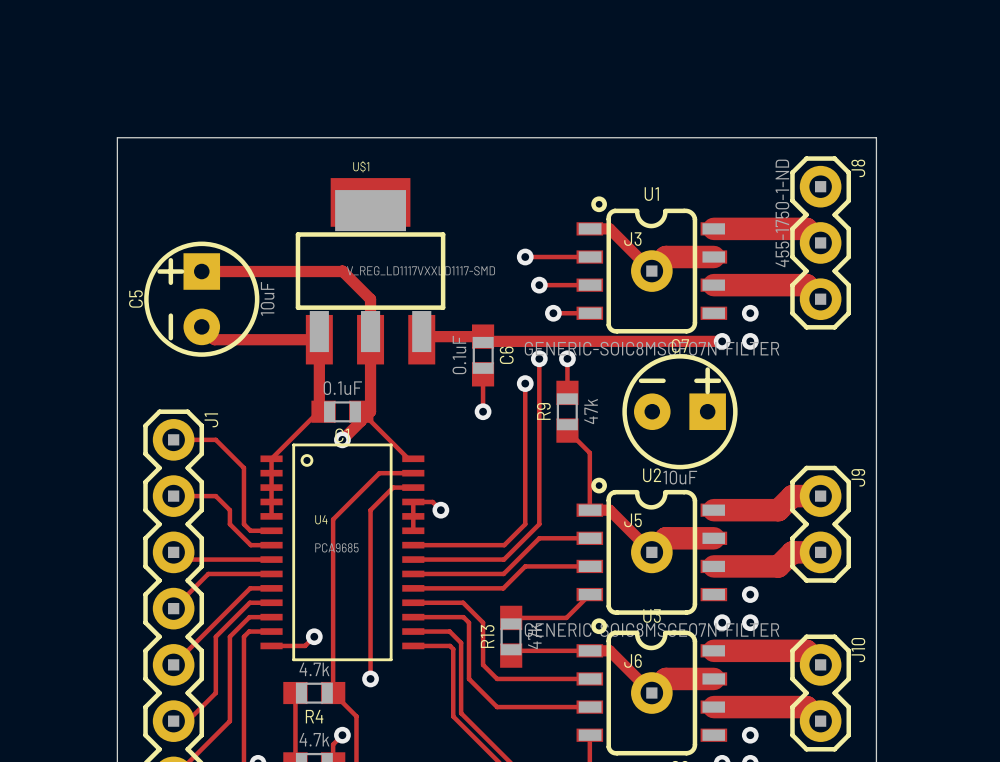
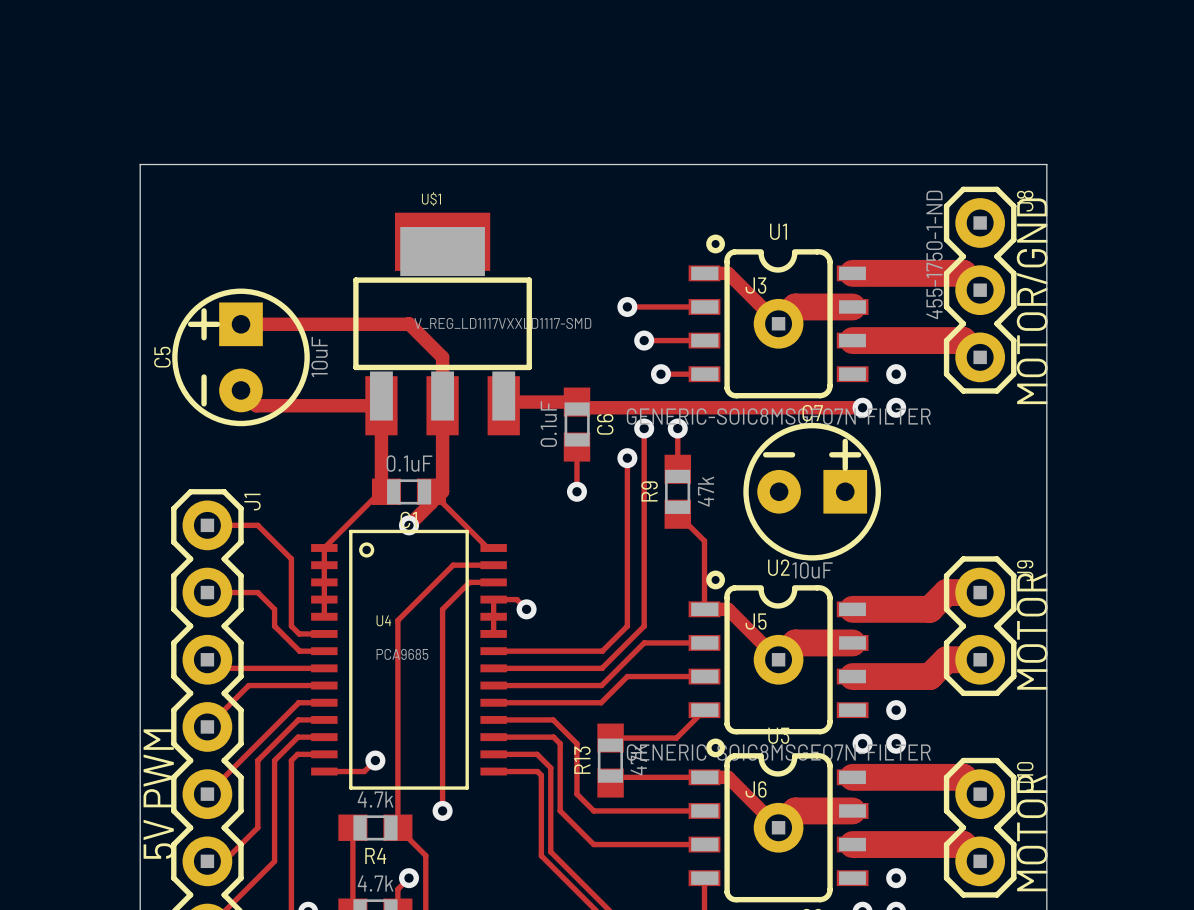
text: none -> MOTOR/GND (1032, 301)
text: none -> MOTOR (1032, 631)
text: none -> 5V PWM (158, 794)
text: none -> MOTOR (1032, 833)

